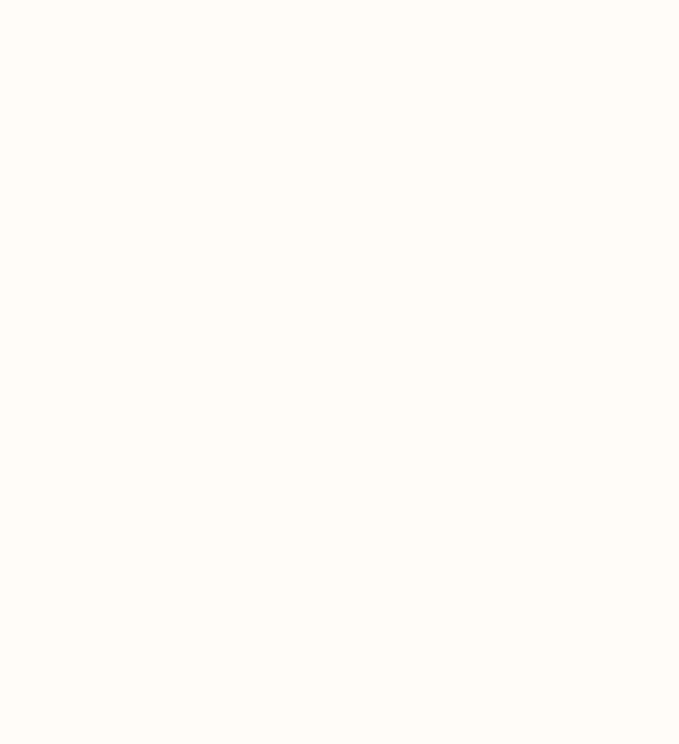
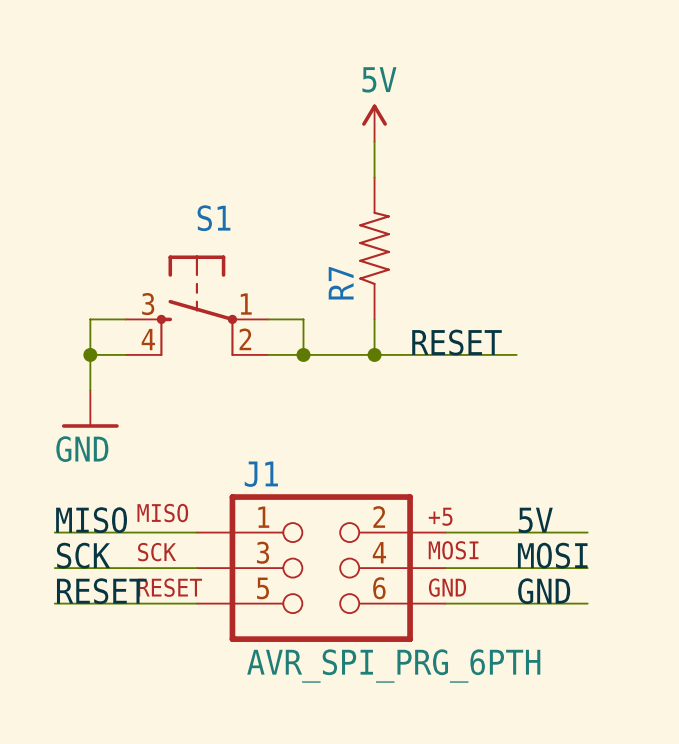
power symbol: none -> 5V (374, 123)
wire: none -> (374, 141) (374, 177)
R7: none -> (374, 248)
S1: none -> (196, 305)
wire: none -> (125, 319) (90, 319) (90, 390)
wire: none -> (267, 319) (303, 319) (303, 354)
wire: none -> (374, 319) (374, 354)
label: none -> RESET (456, 342)
wire: none -> (90, 354) (125, 354)
junction: none -> (90, 354)
wire: none -> (267, 354) (516, 354)
junction: none -> (303, 354)
junction: none -> (374, 354)
power symbol: none -> GND (90, 409)
label: none -> MISO (91, 520)
label: none -> 5V (535, 520)
wire: none -> (54, 532) (196, 532)
wire: none -> (445, 532) (587, 532)
label: none -> SCK (83, 555)
label: none -> MOSI (552, 555)
wire: none -> (54, 568) (196, 568)
J1: none -> AVR_SPI_PRG_6PTH (321, 568)
wire: none -> (445, 568) (587, 568)
label: none -> RESET (101, 591)
label: none -> GND (544, 591)
wire: none -> (54, 603) (196, 603)
wire: none -> (445, 603) (587, 603)

